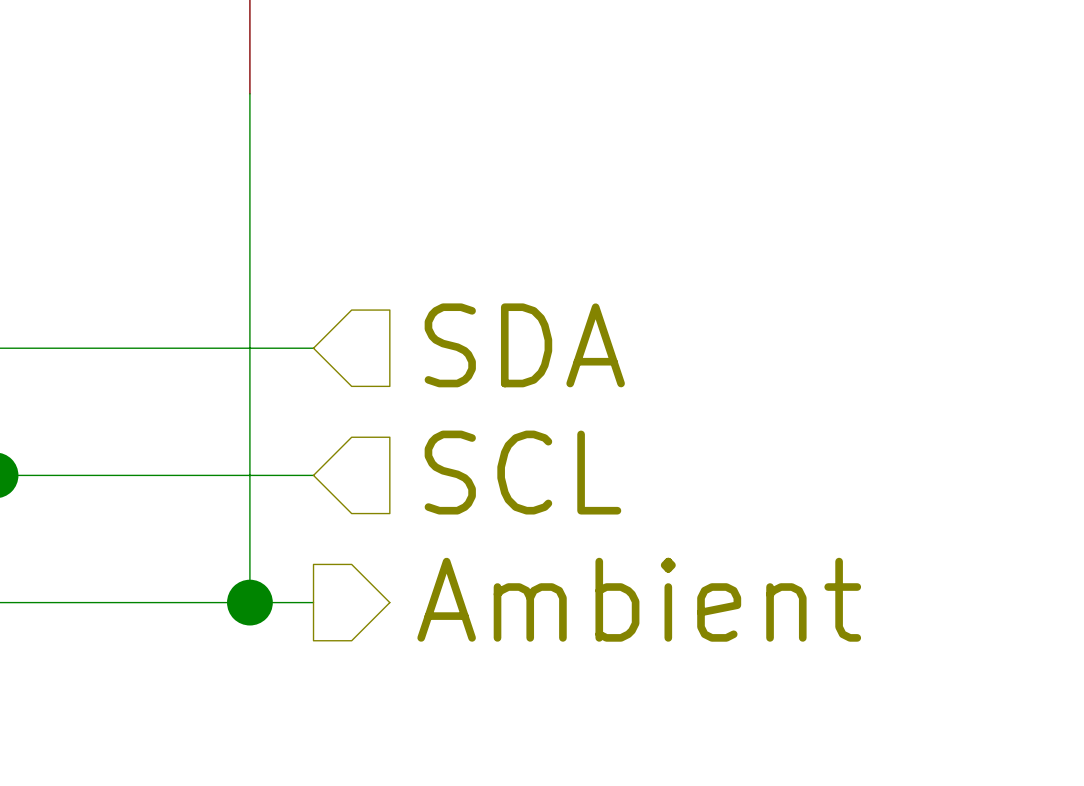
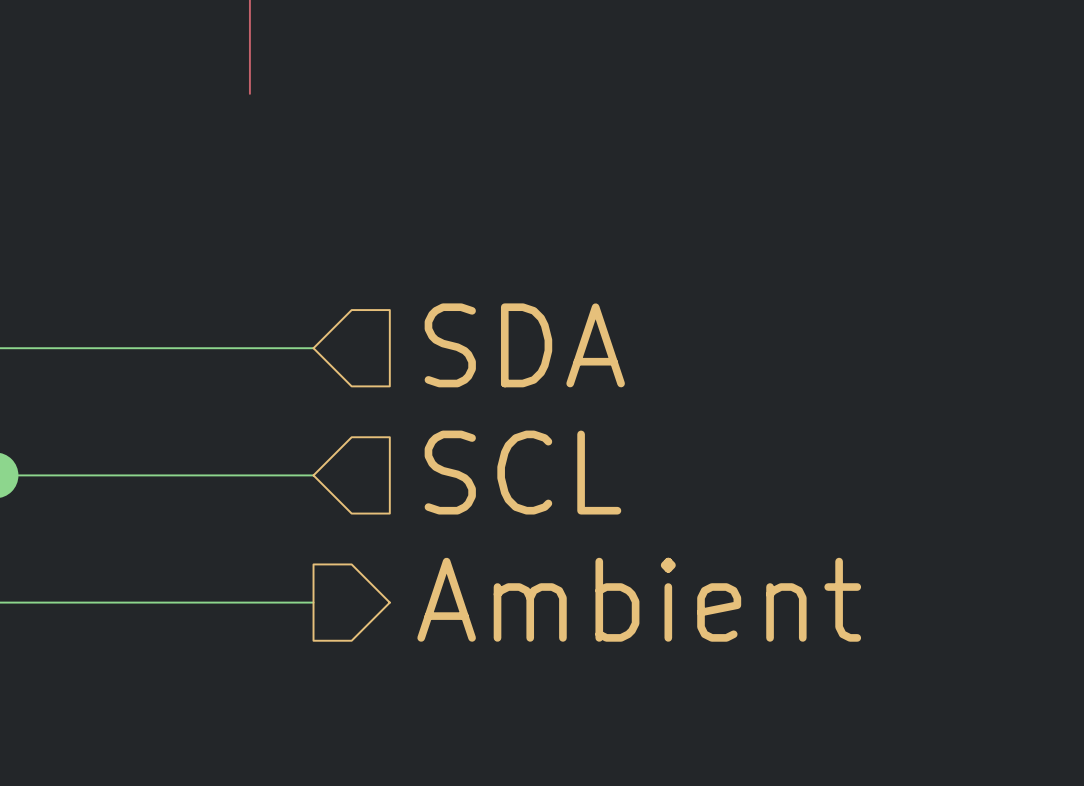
wire: (249, 93) (249, 602) -> none
junction: (249, 602) -> none

